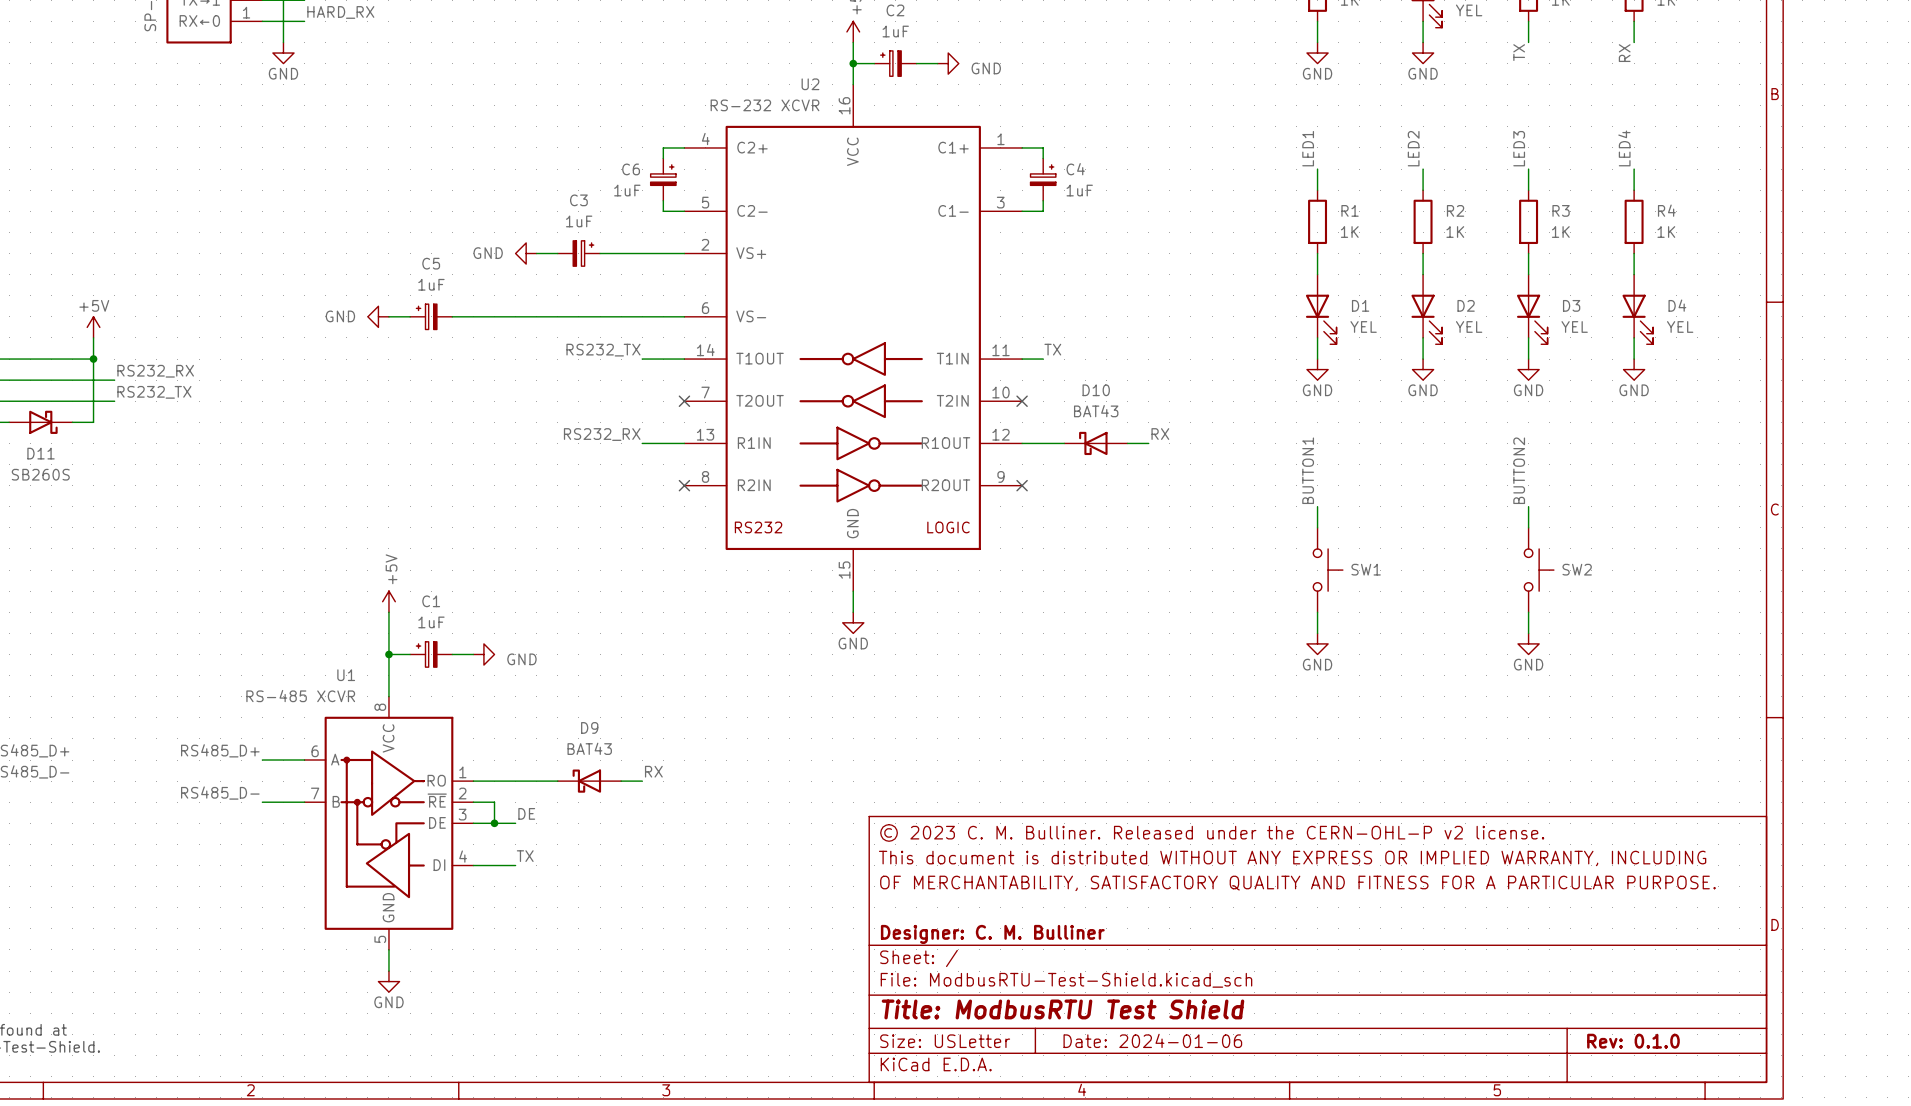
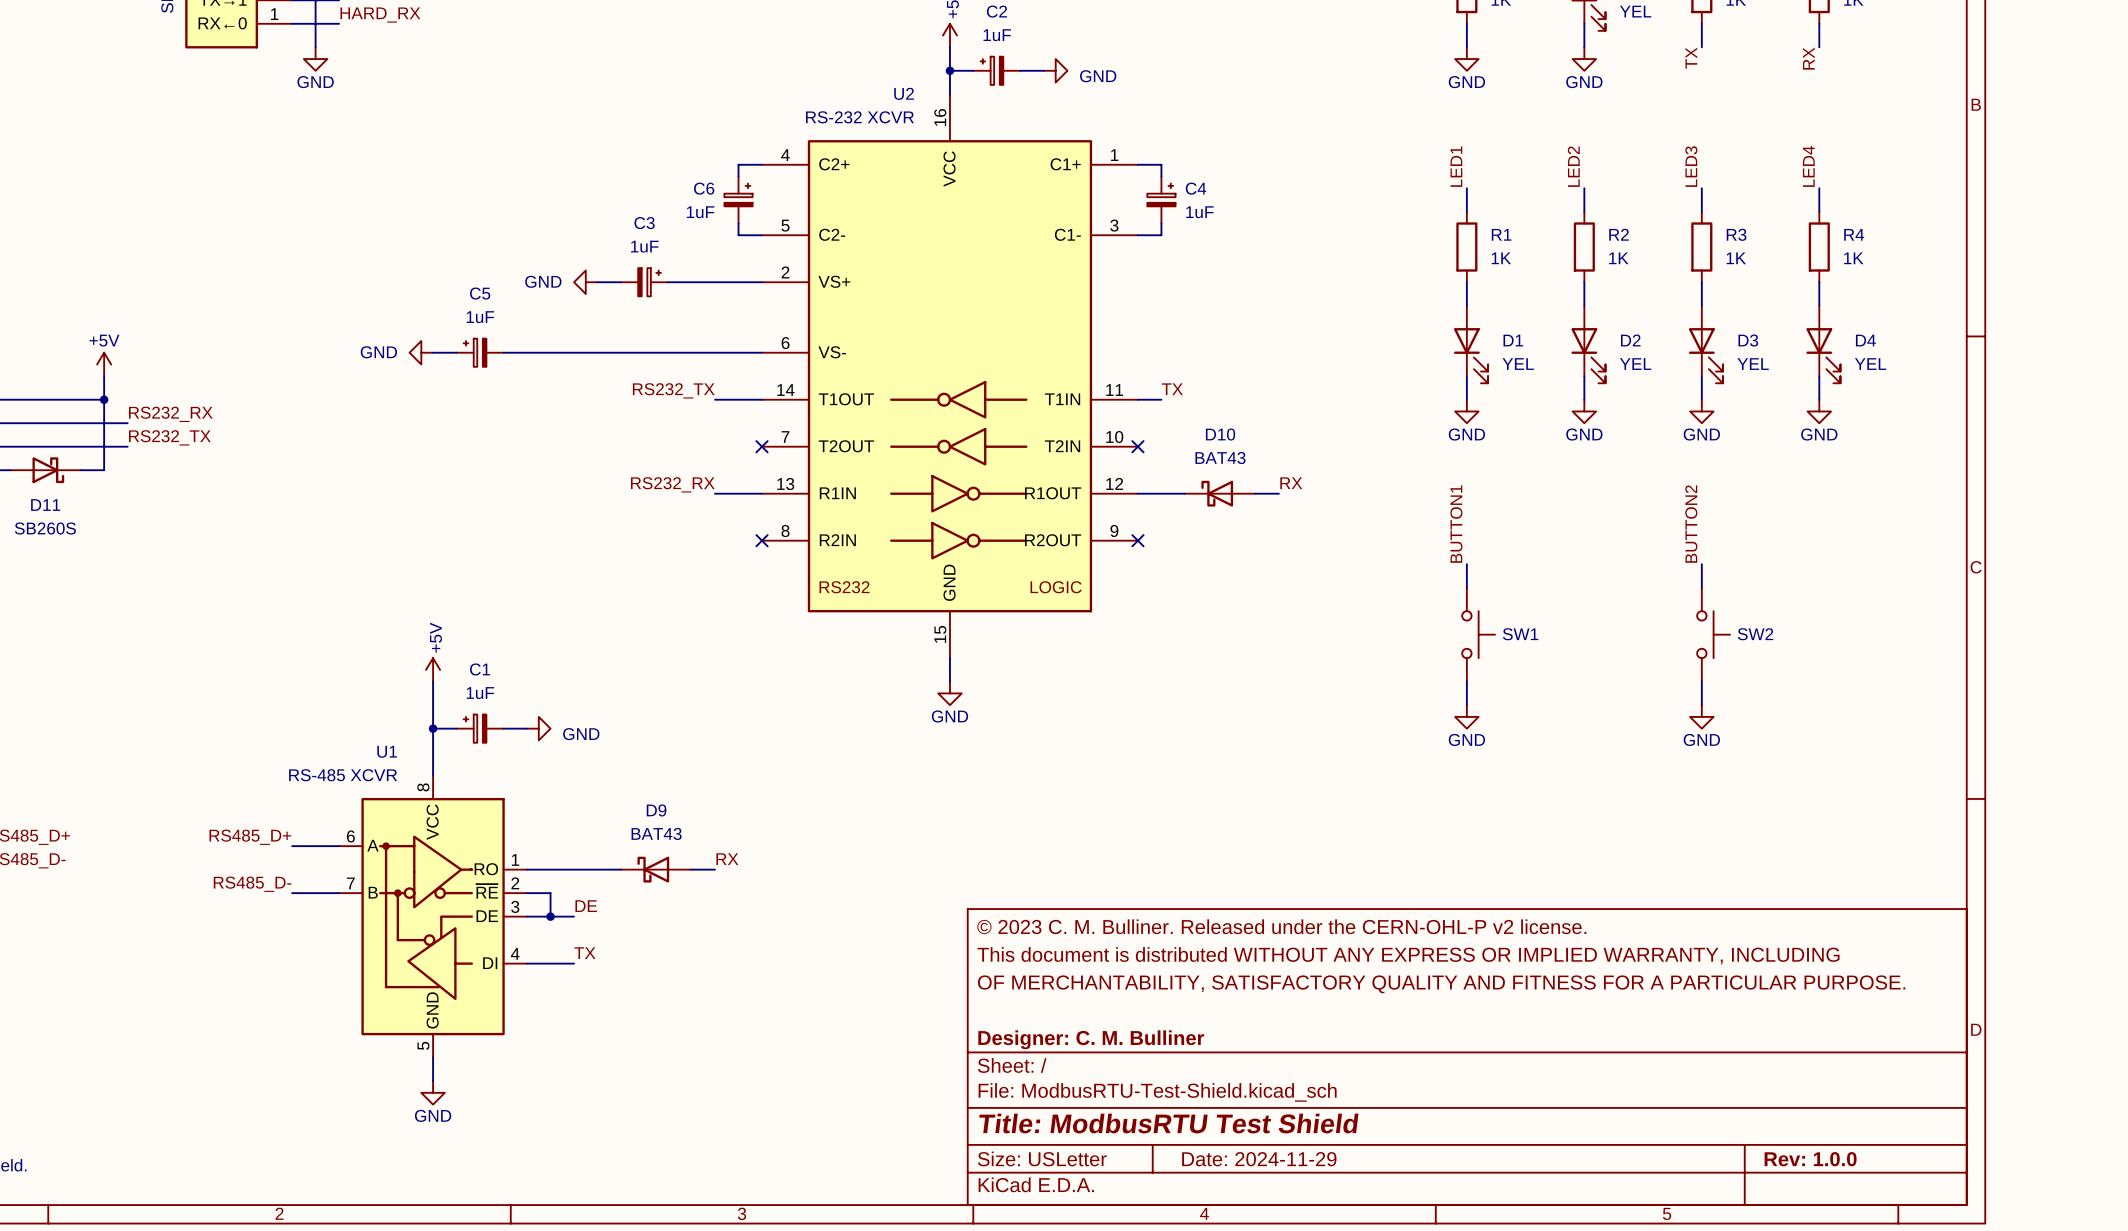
title block: Date: 2024-01-06 (1152, 1040) -> Date: 2024-11-29 (1259, 1159)
title block: Rev: 0.1.0 (1633, 1041) -> Rev: 1.0.0 (1810, 1159)

